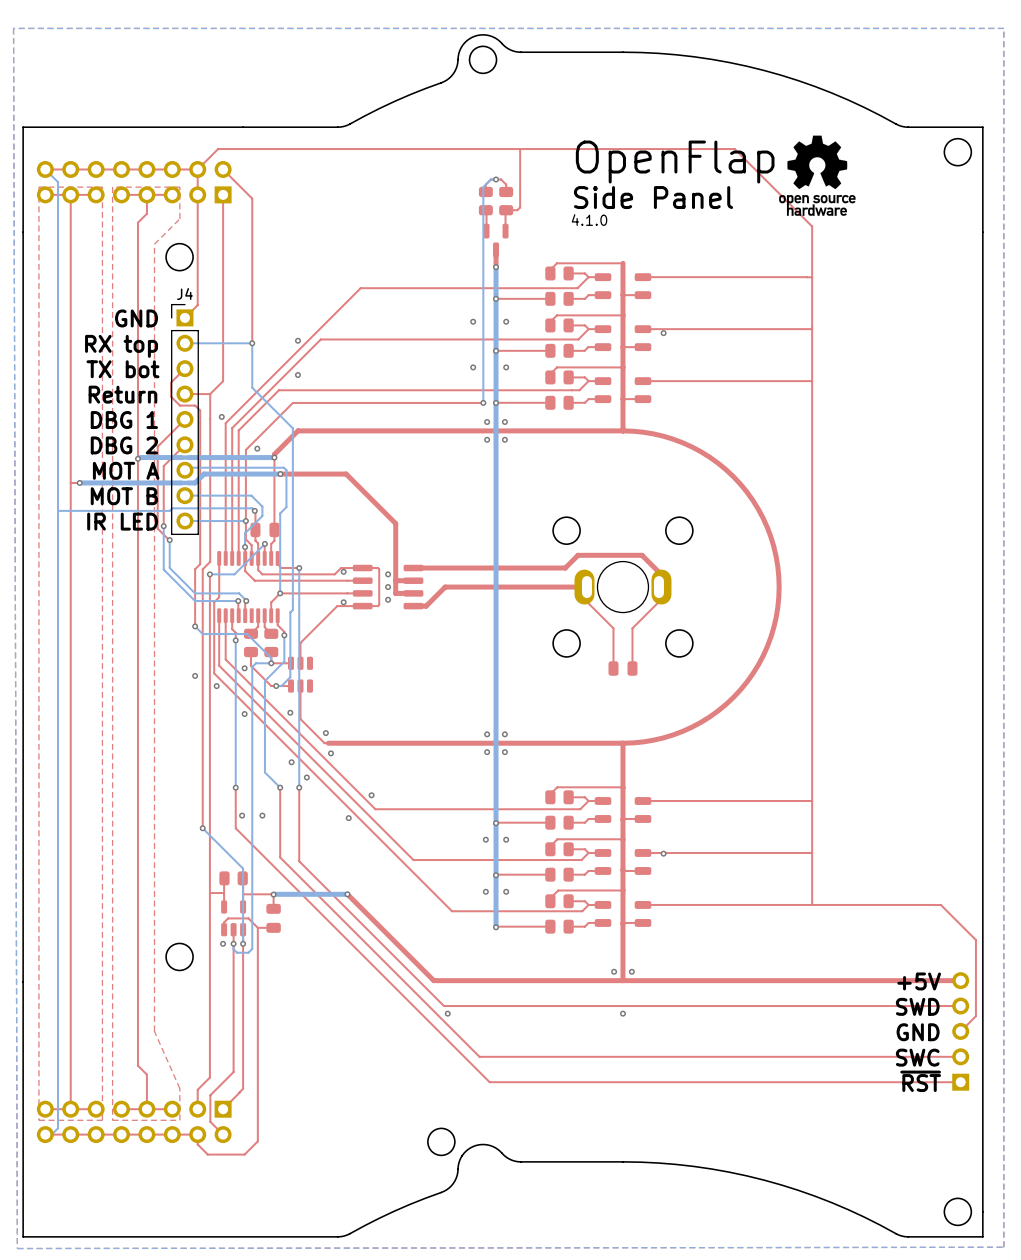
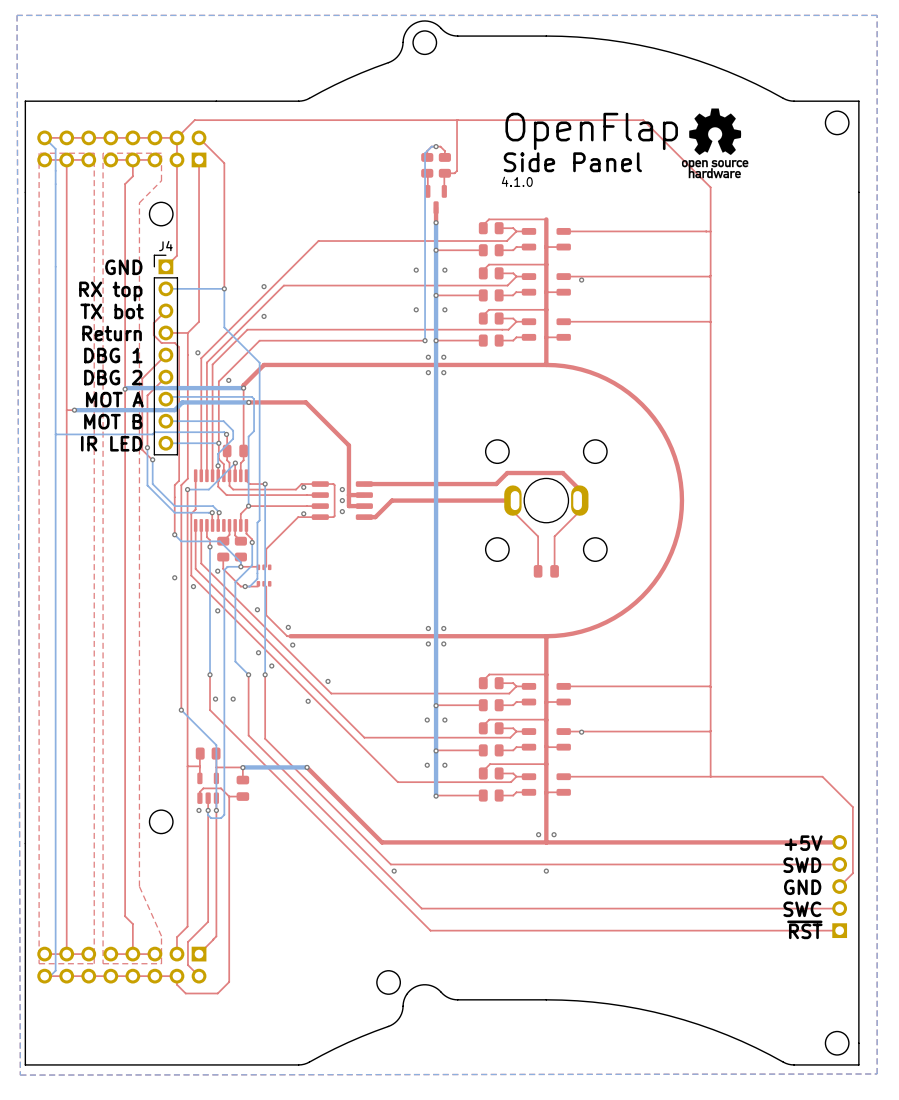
part footprint: [288, 656, 313, 693] -> [256, 564, 272, 587]

